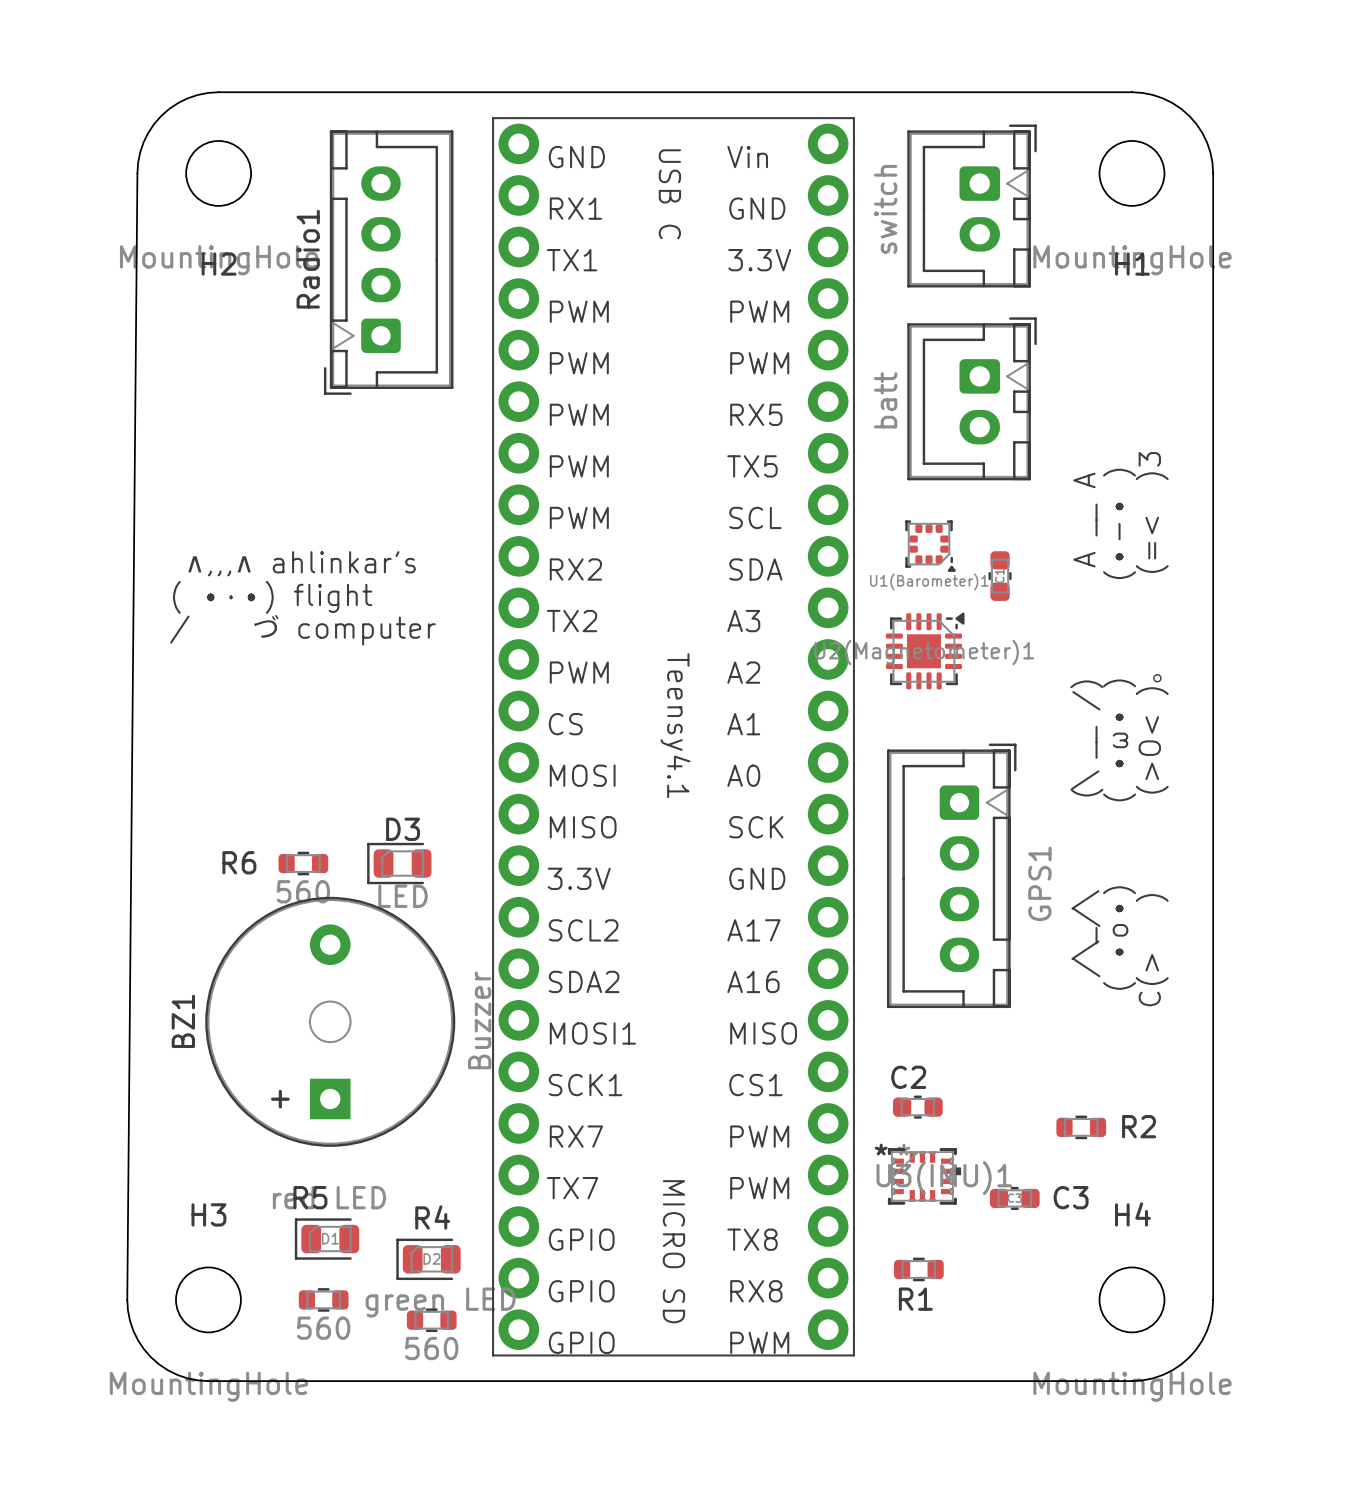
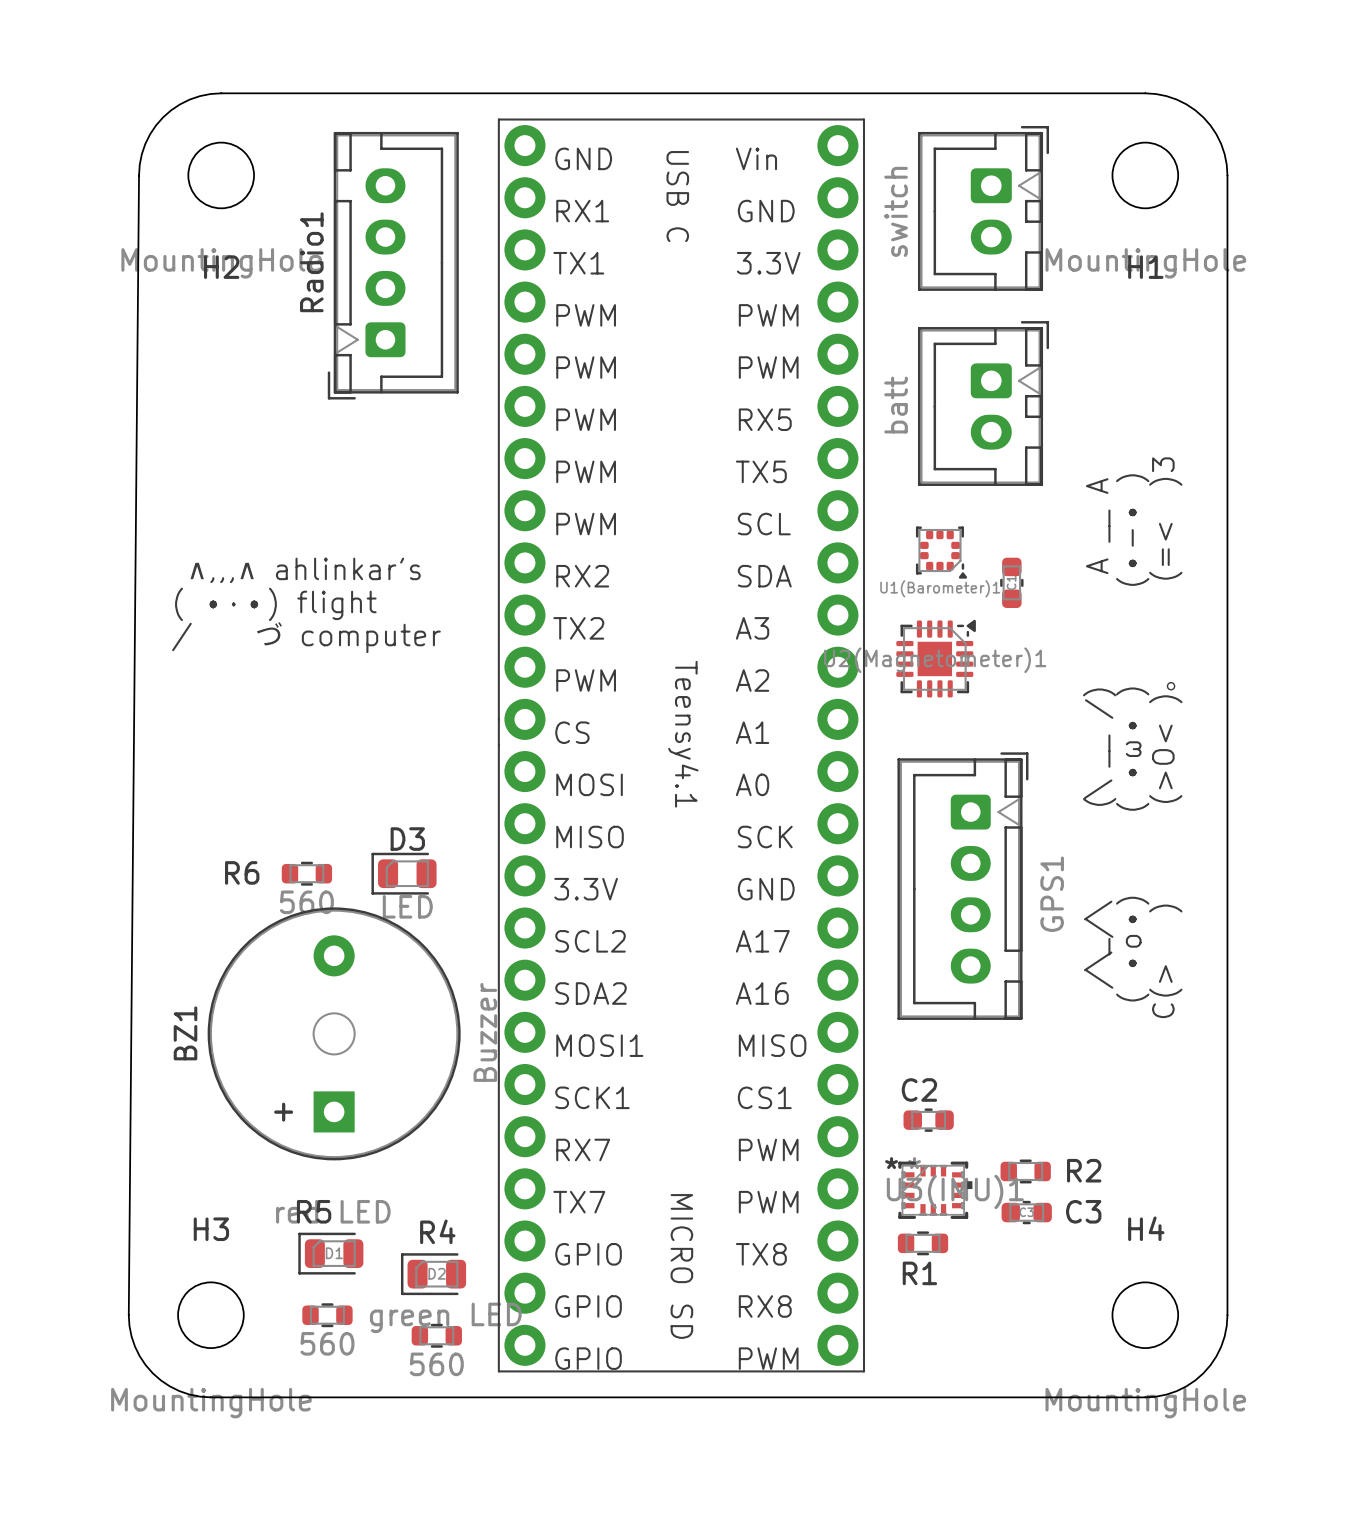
R2 position: (1081, 1127) -> (1025, 1171)
R1 position: (918, 1269) -> (923, 1243)

